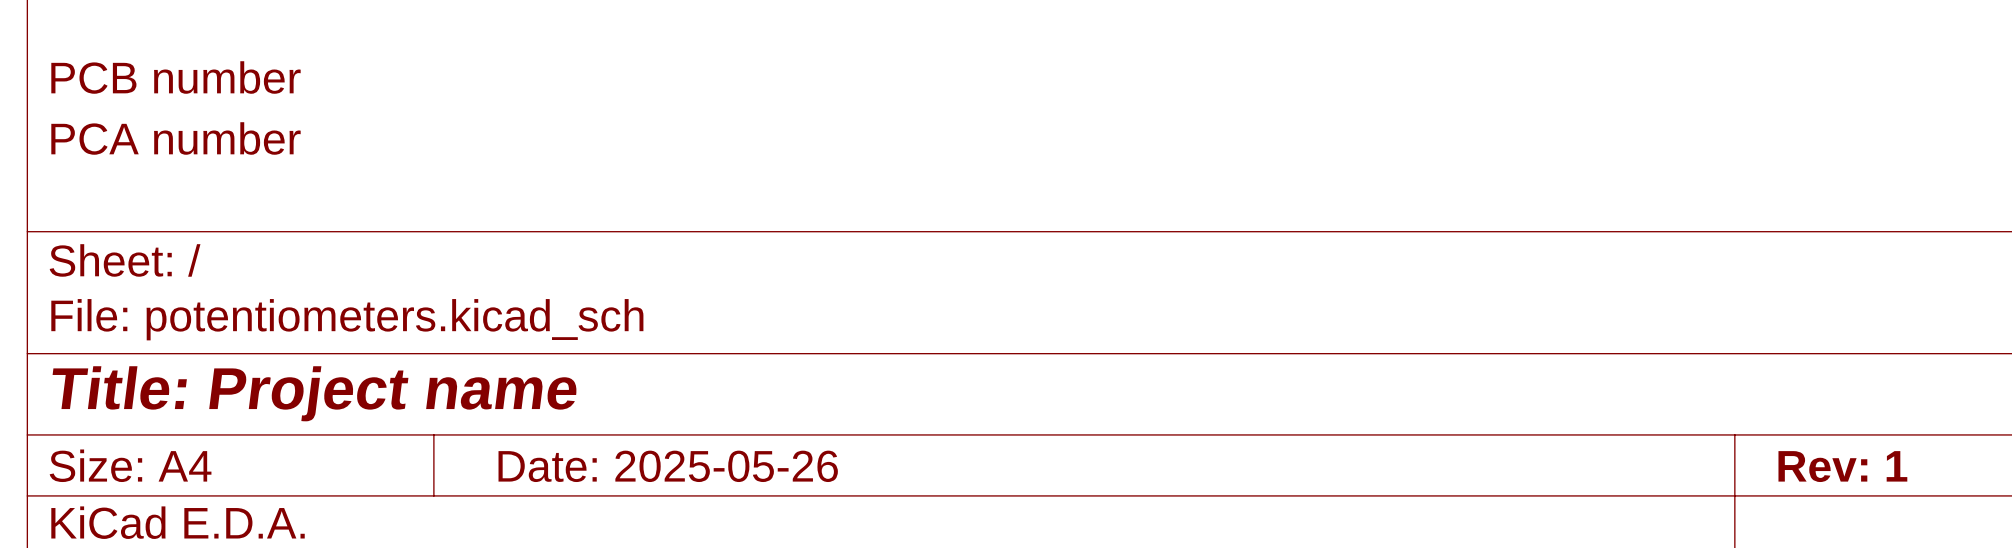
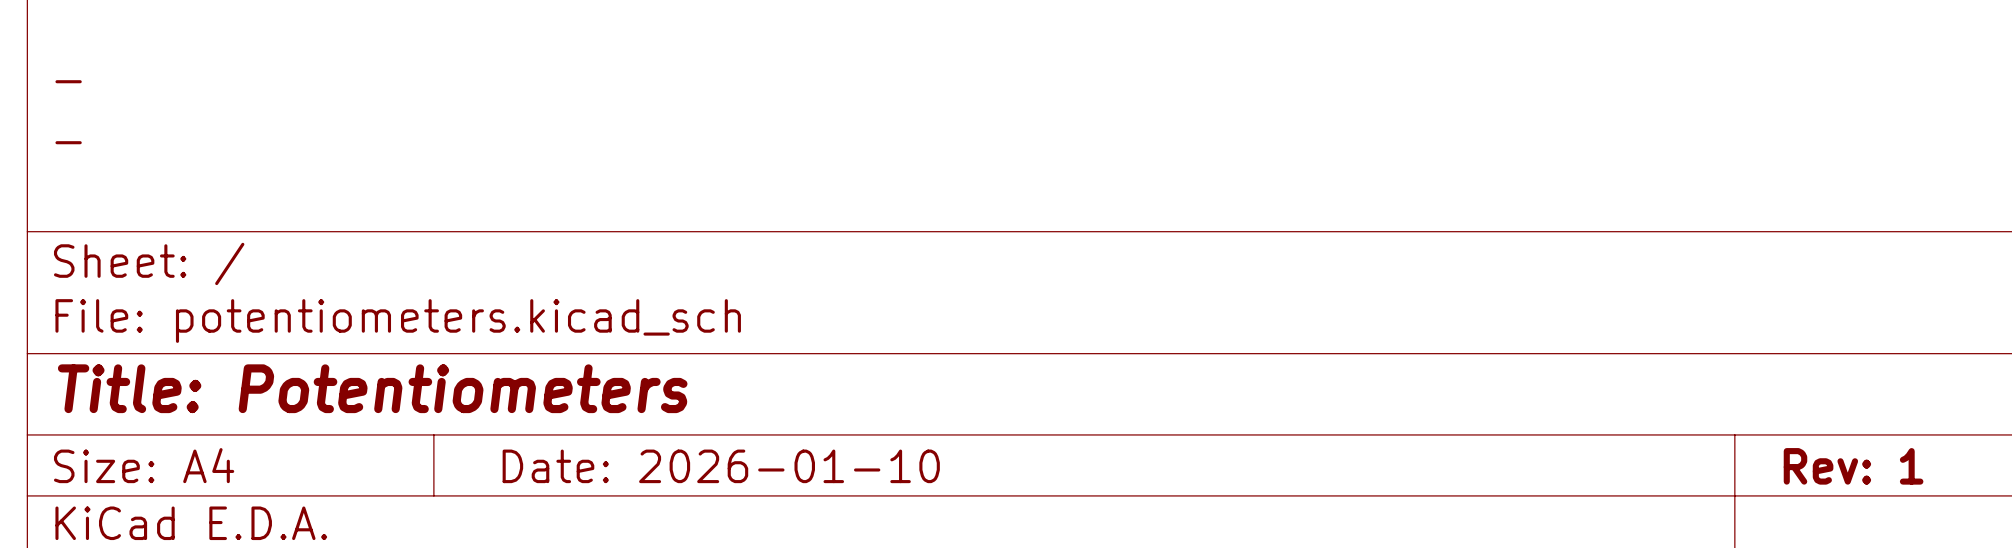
title block: PCB number (175, 77) -> - (68, 81)
title block: PCA number (175, 138) -> - (68, 142)
title block: Title: Project name (314, 393) -> Title: Potentiometers (372, 388)
title block: Date: 2025-05-26 (668, 466) -> Date: 2026-01-10 (721, 466)

